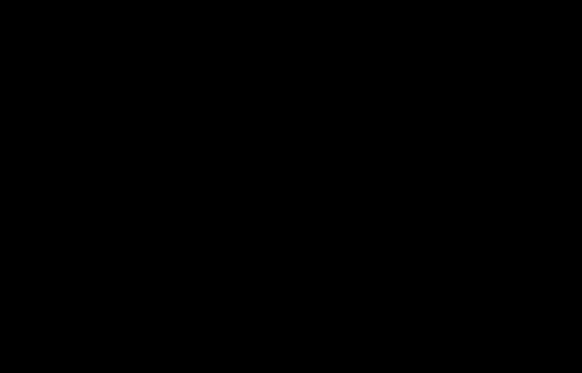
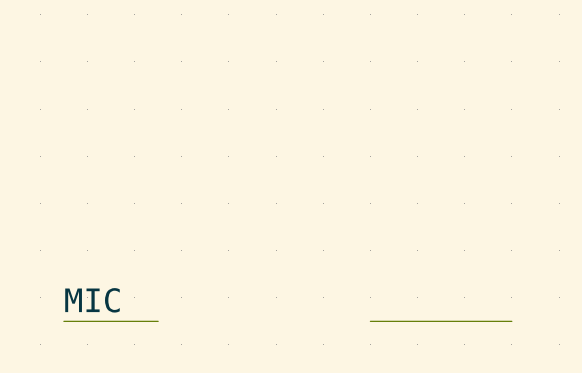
label: none -> MIC (92, 300)
wire: none -> (63, 321) (158, 321)
wire: none -> (370, 321) (511, 321)

